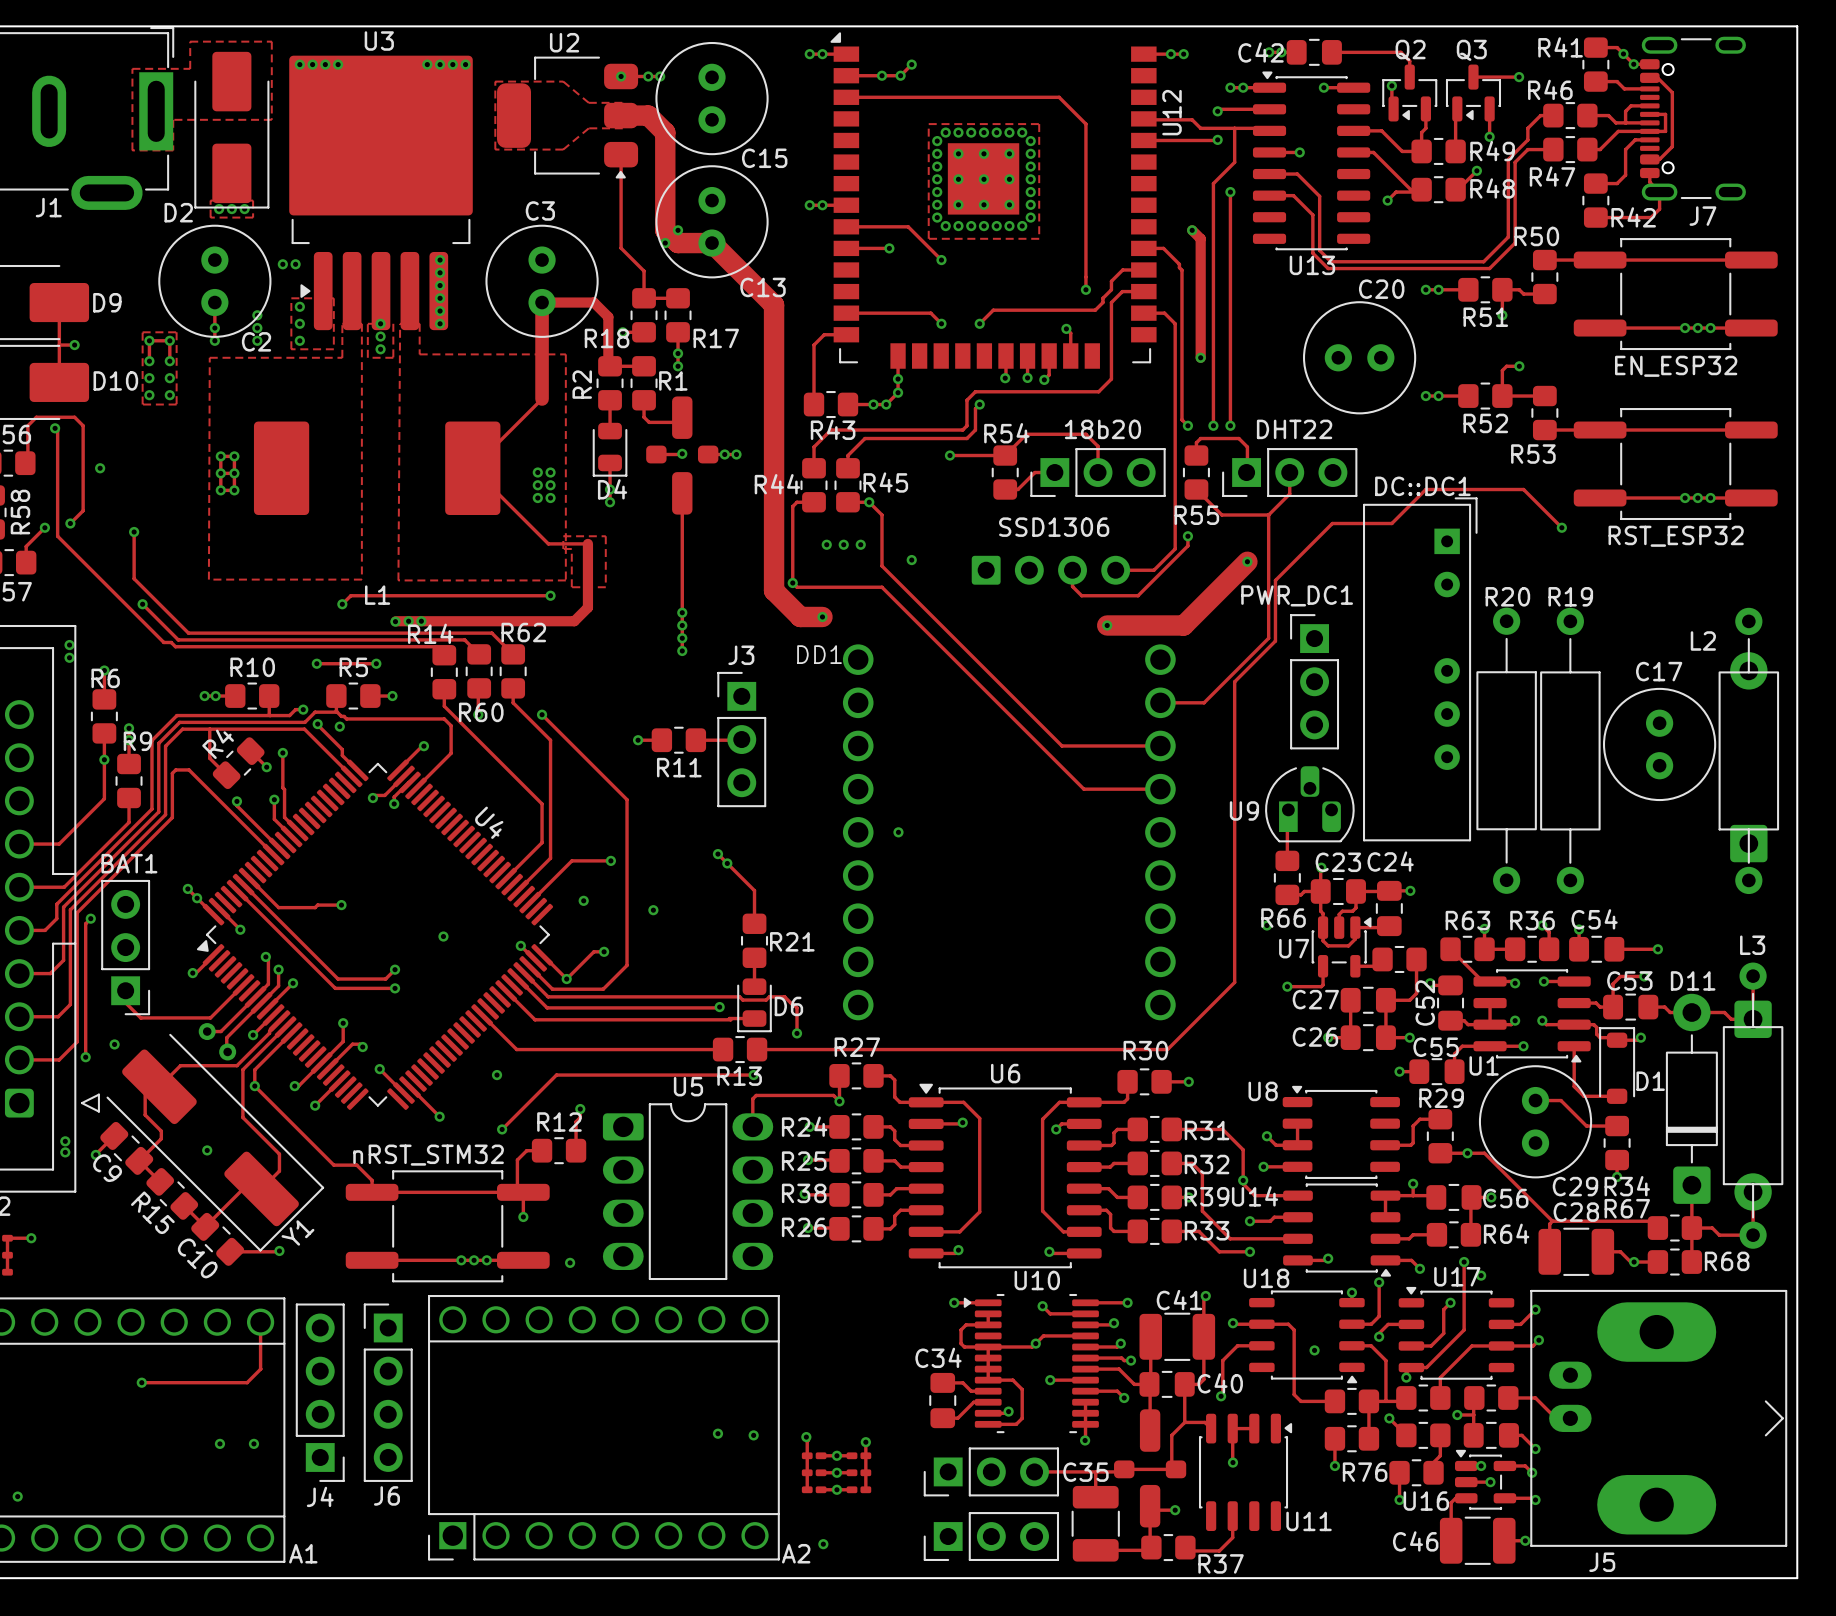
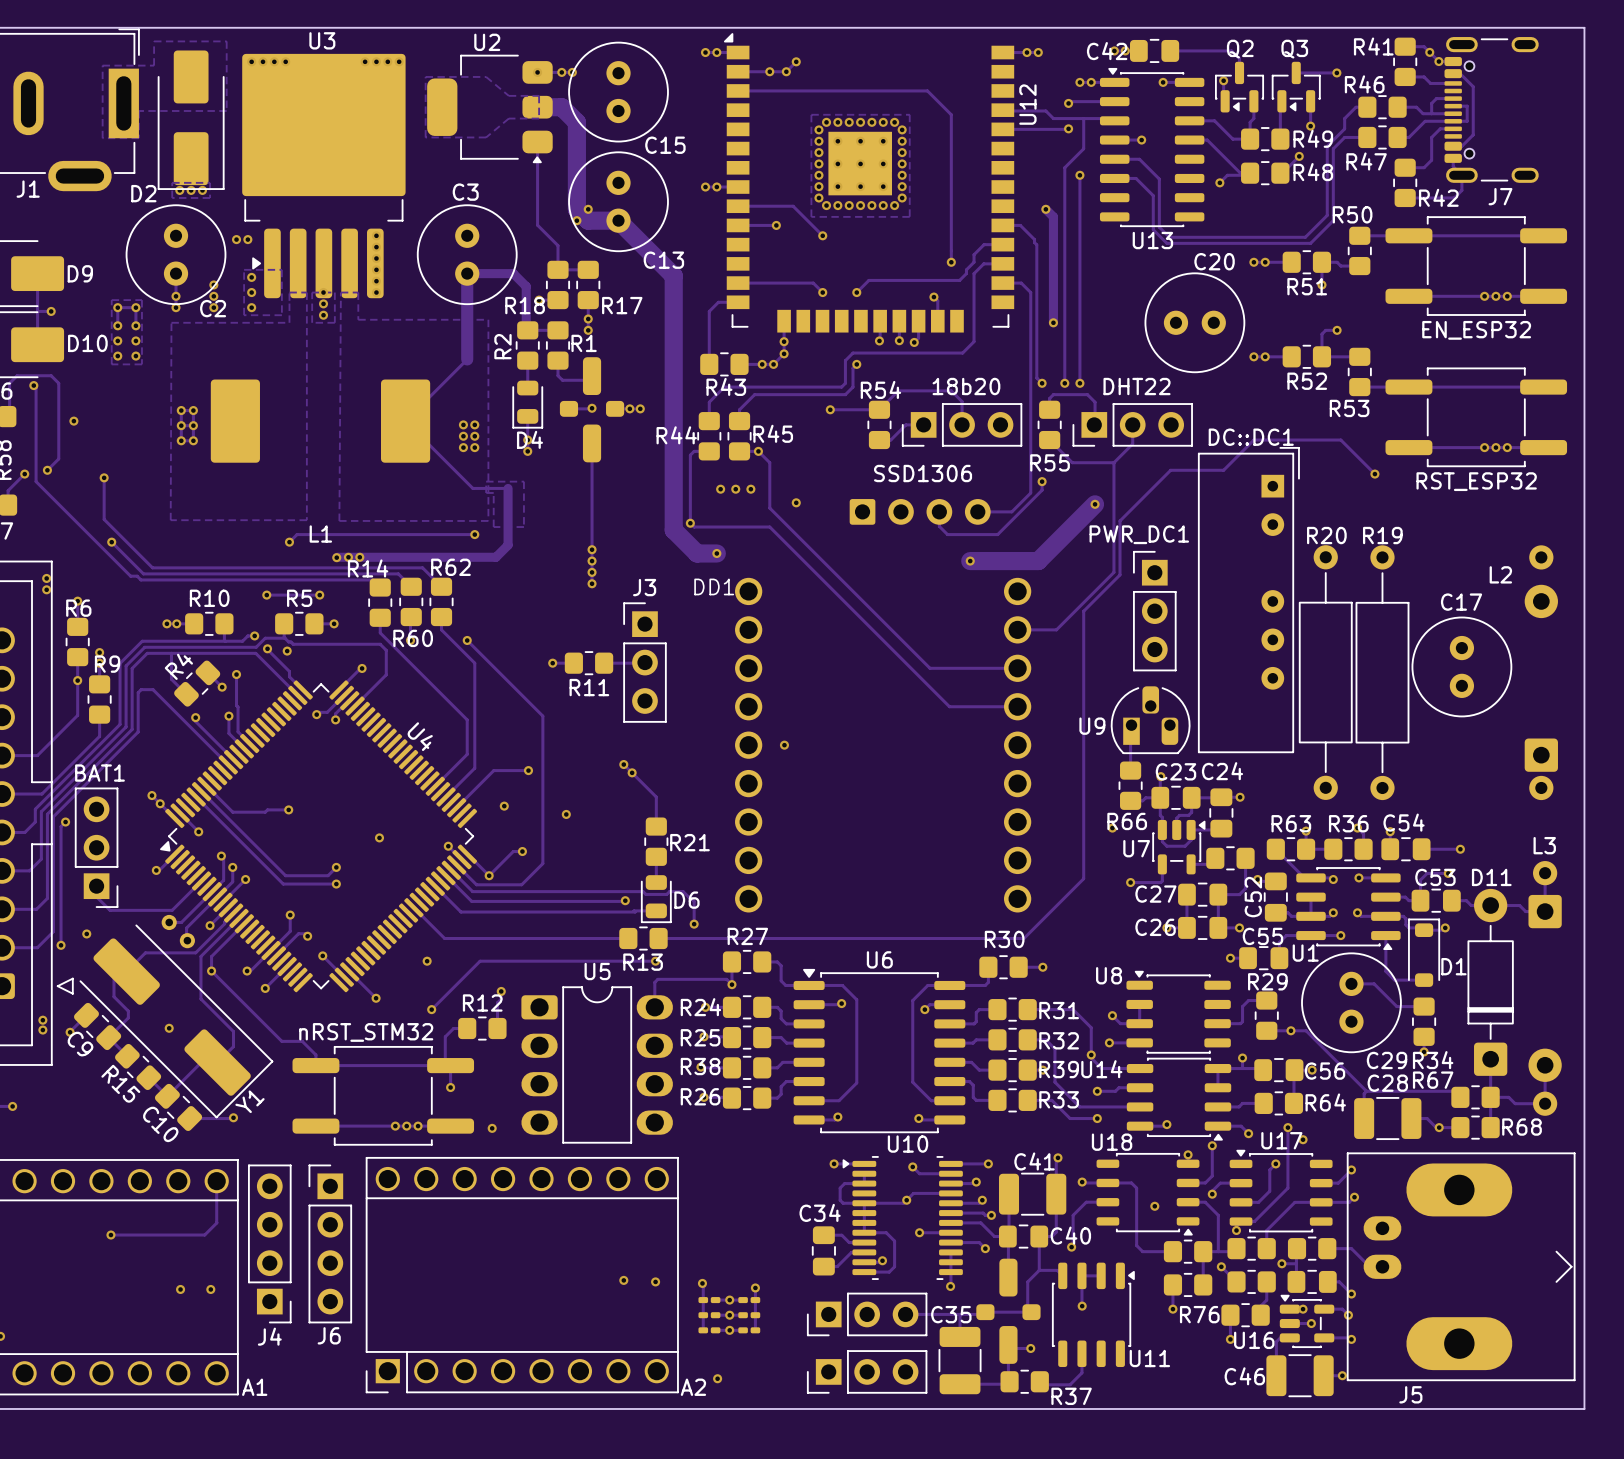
L2 footprint: [1718, 607, 1780, 895] -> [1529, 545, 1554, 801]
L3 footprint: [1722, 962, 1784, 1249] -> [1533, 861, 1558, 1116]

